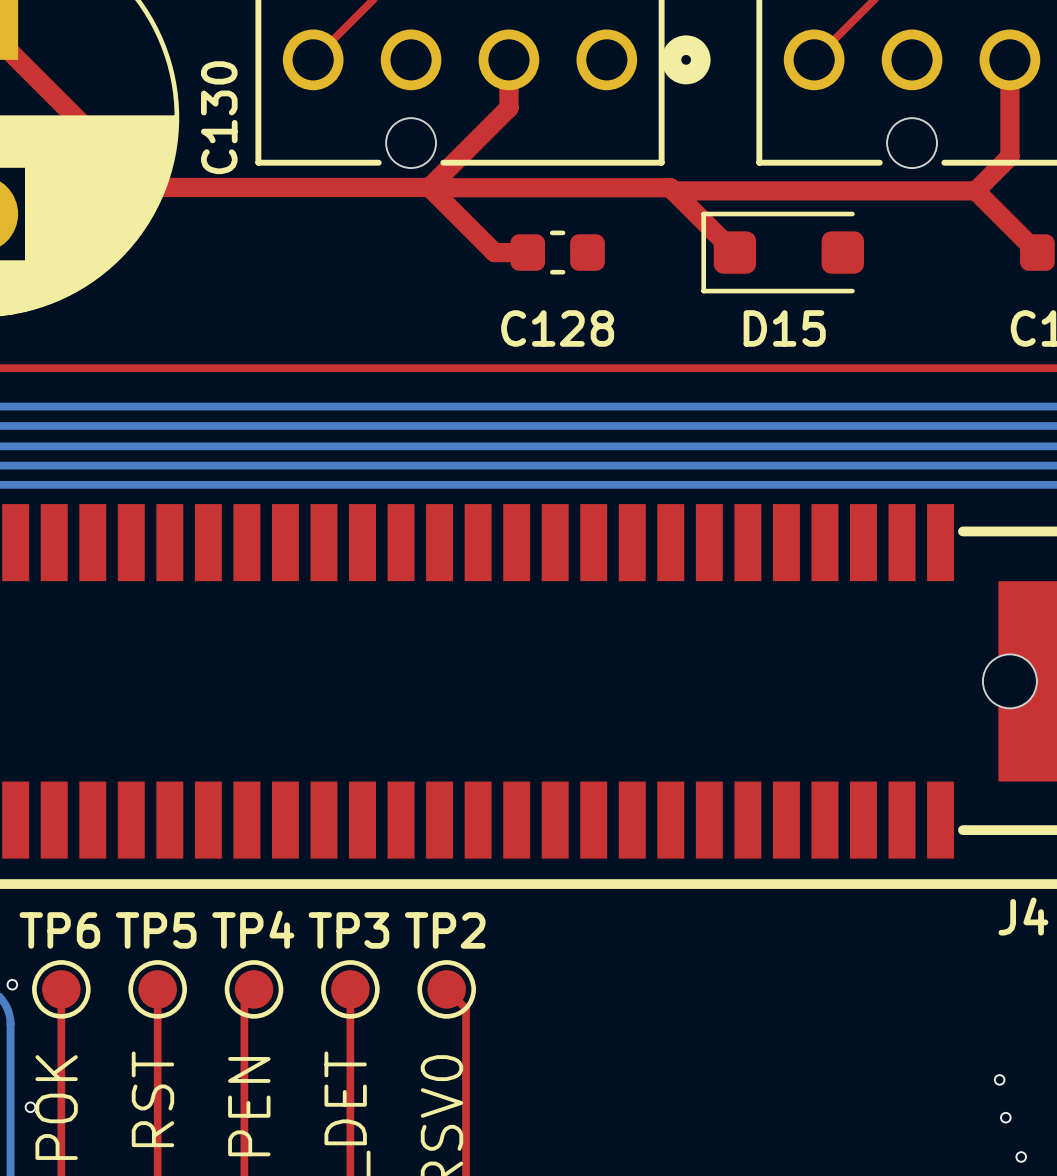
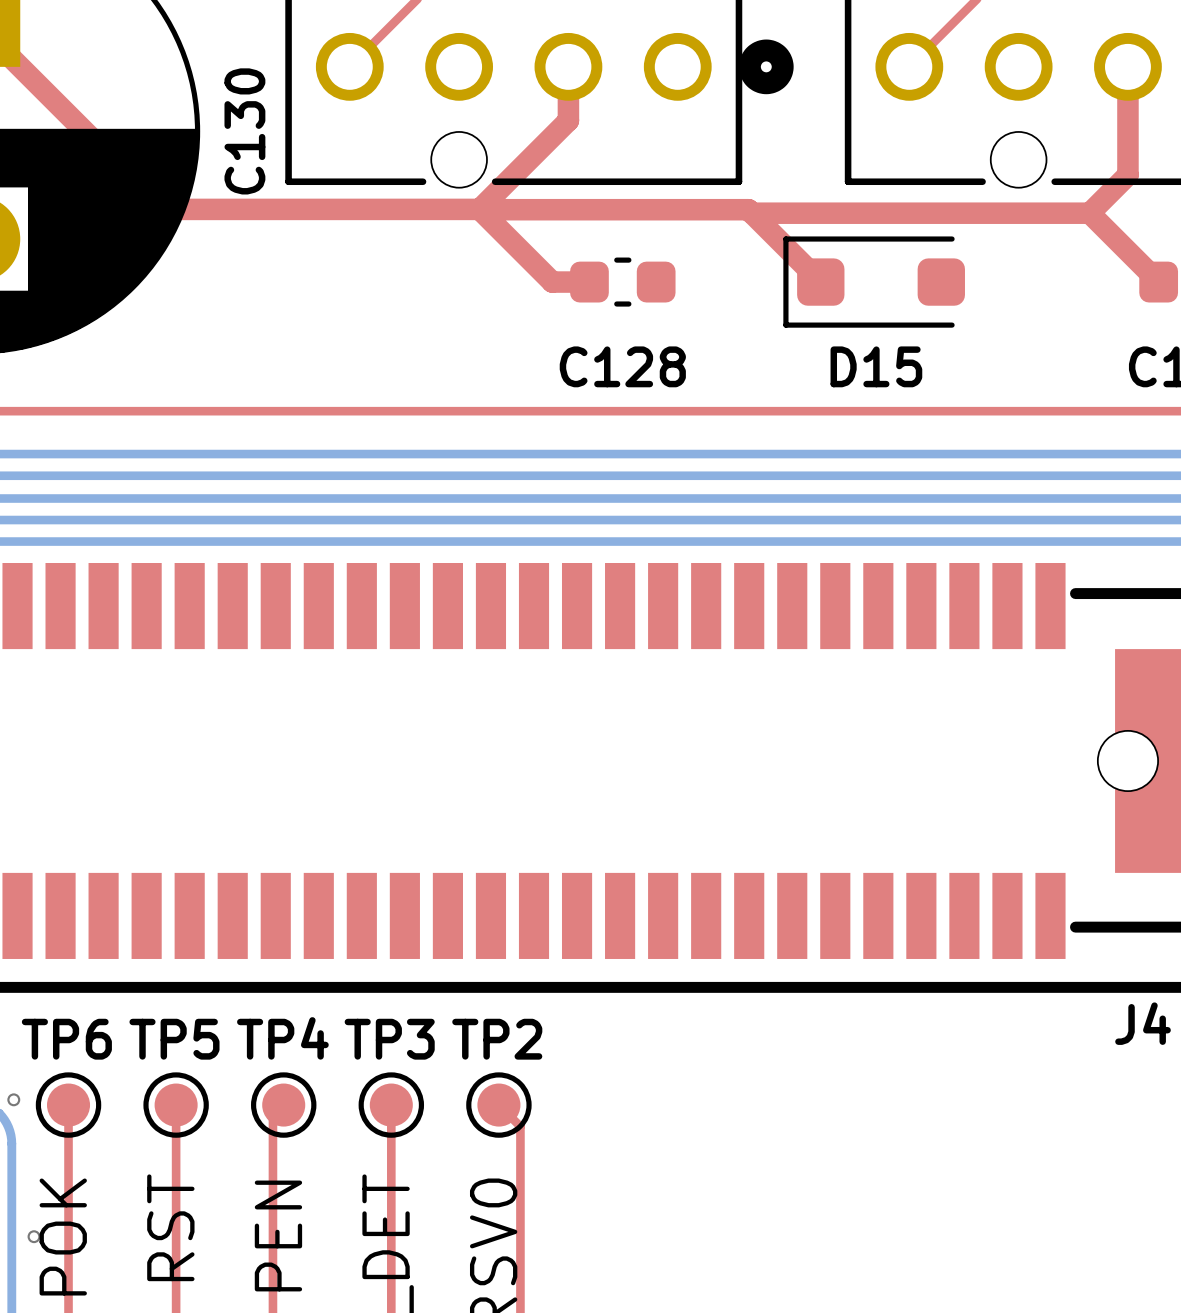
via: (999, 1079) -> none
via: (1005, 1117) -> none
via: (1021, 1156) -> none

